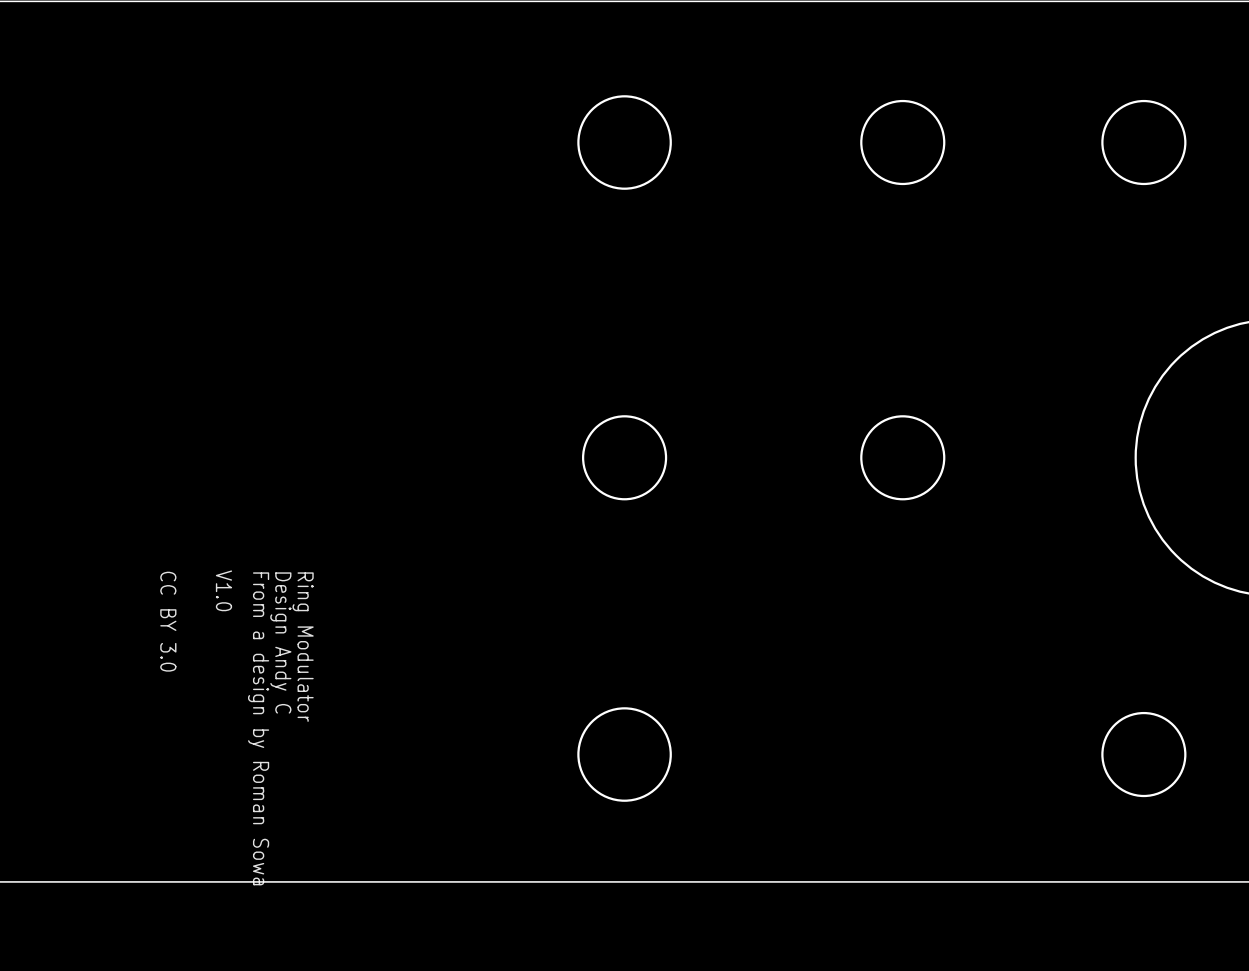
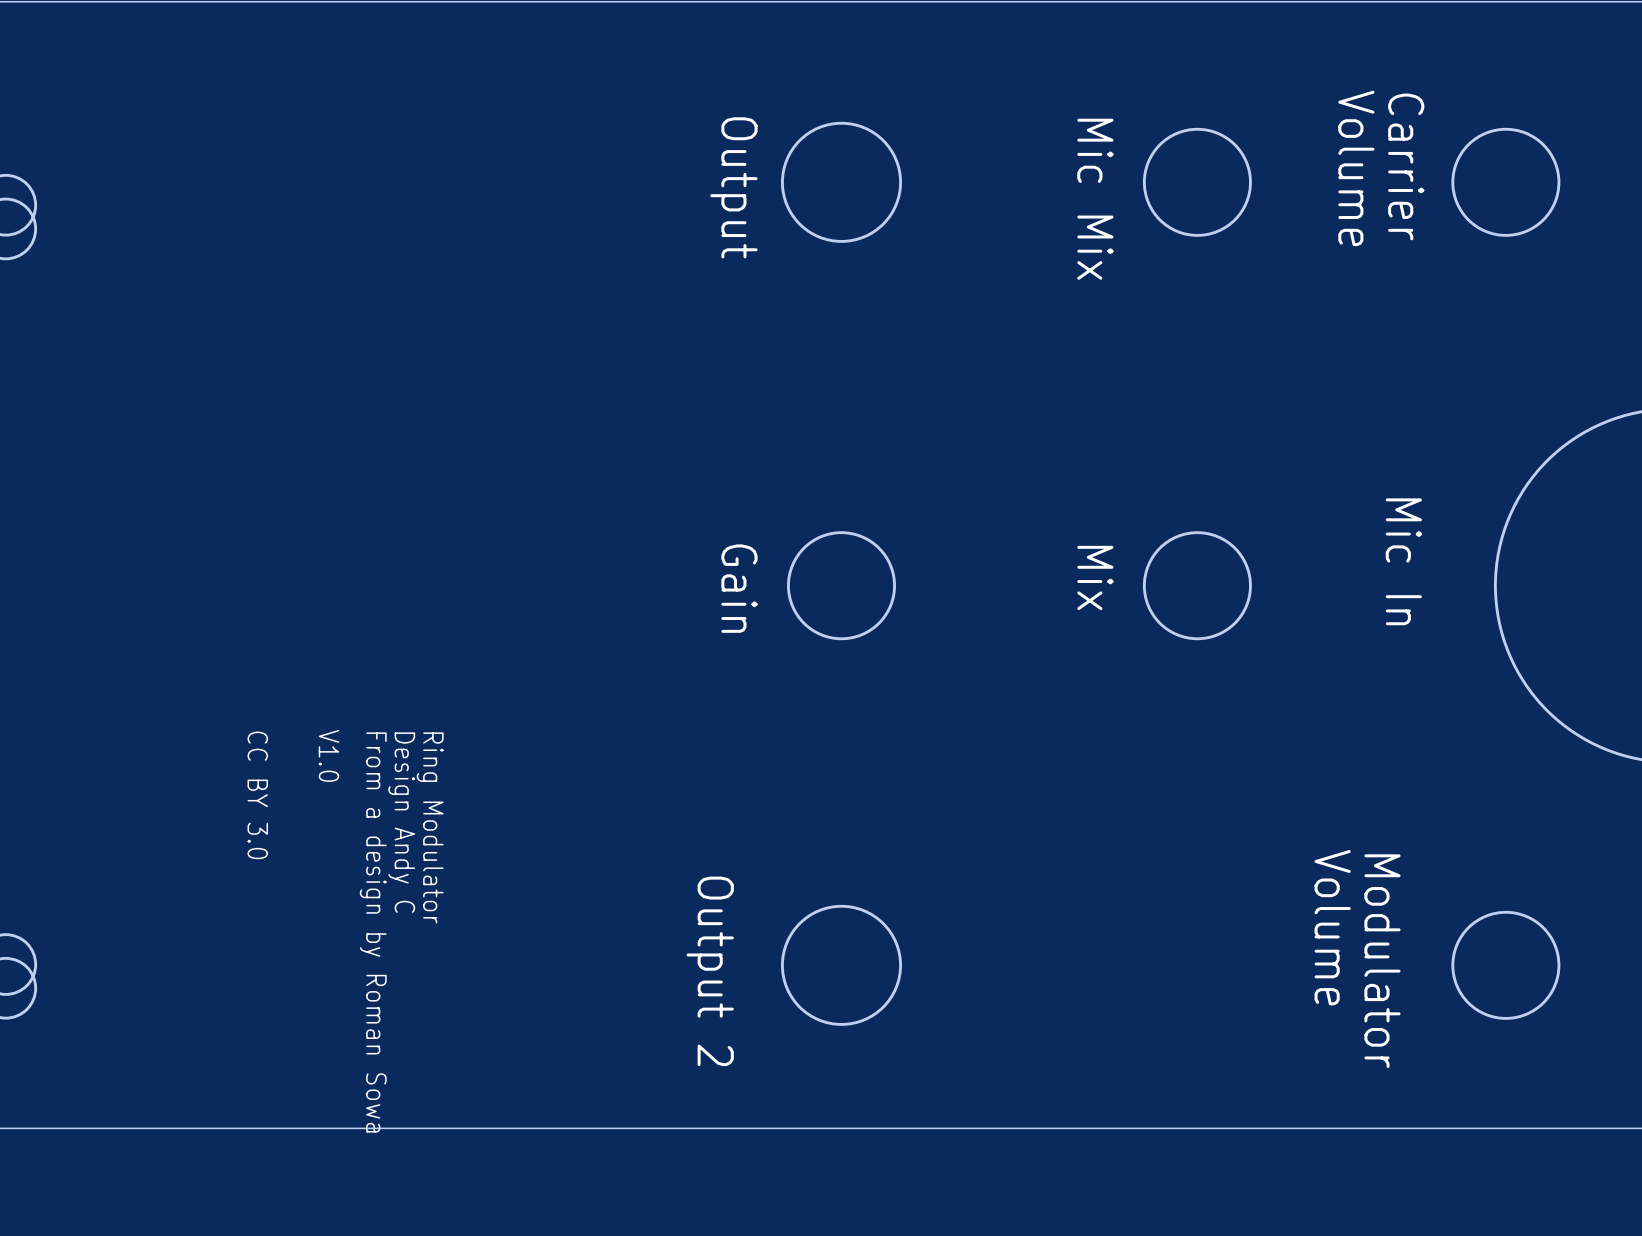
text: none -> Carrier (1406, 166)
text: none -> Volume (1356, 168)
text: none -> Output (733, 187)
text: none -> Mic Mix (1095, 199)
text: none -> Mic In (1403, 561)
text: none -> Mix (1095, 577)
text: none -> Gain (739, 588)
text: none -> Volume (1332, 927)
text: none -> Modulator (1382, 961)
text: none -> Output 2 (710, 971)

